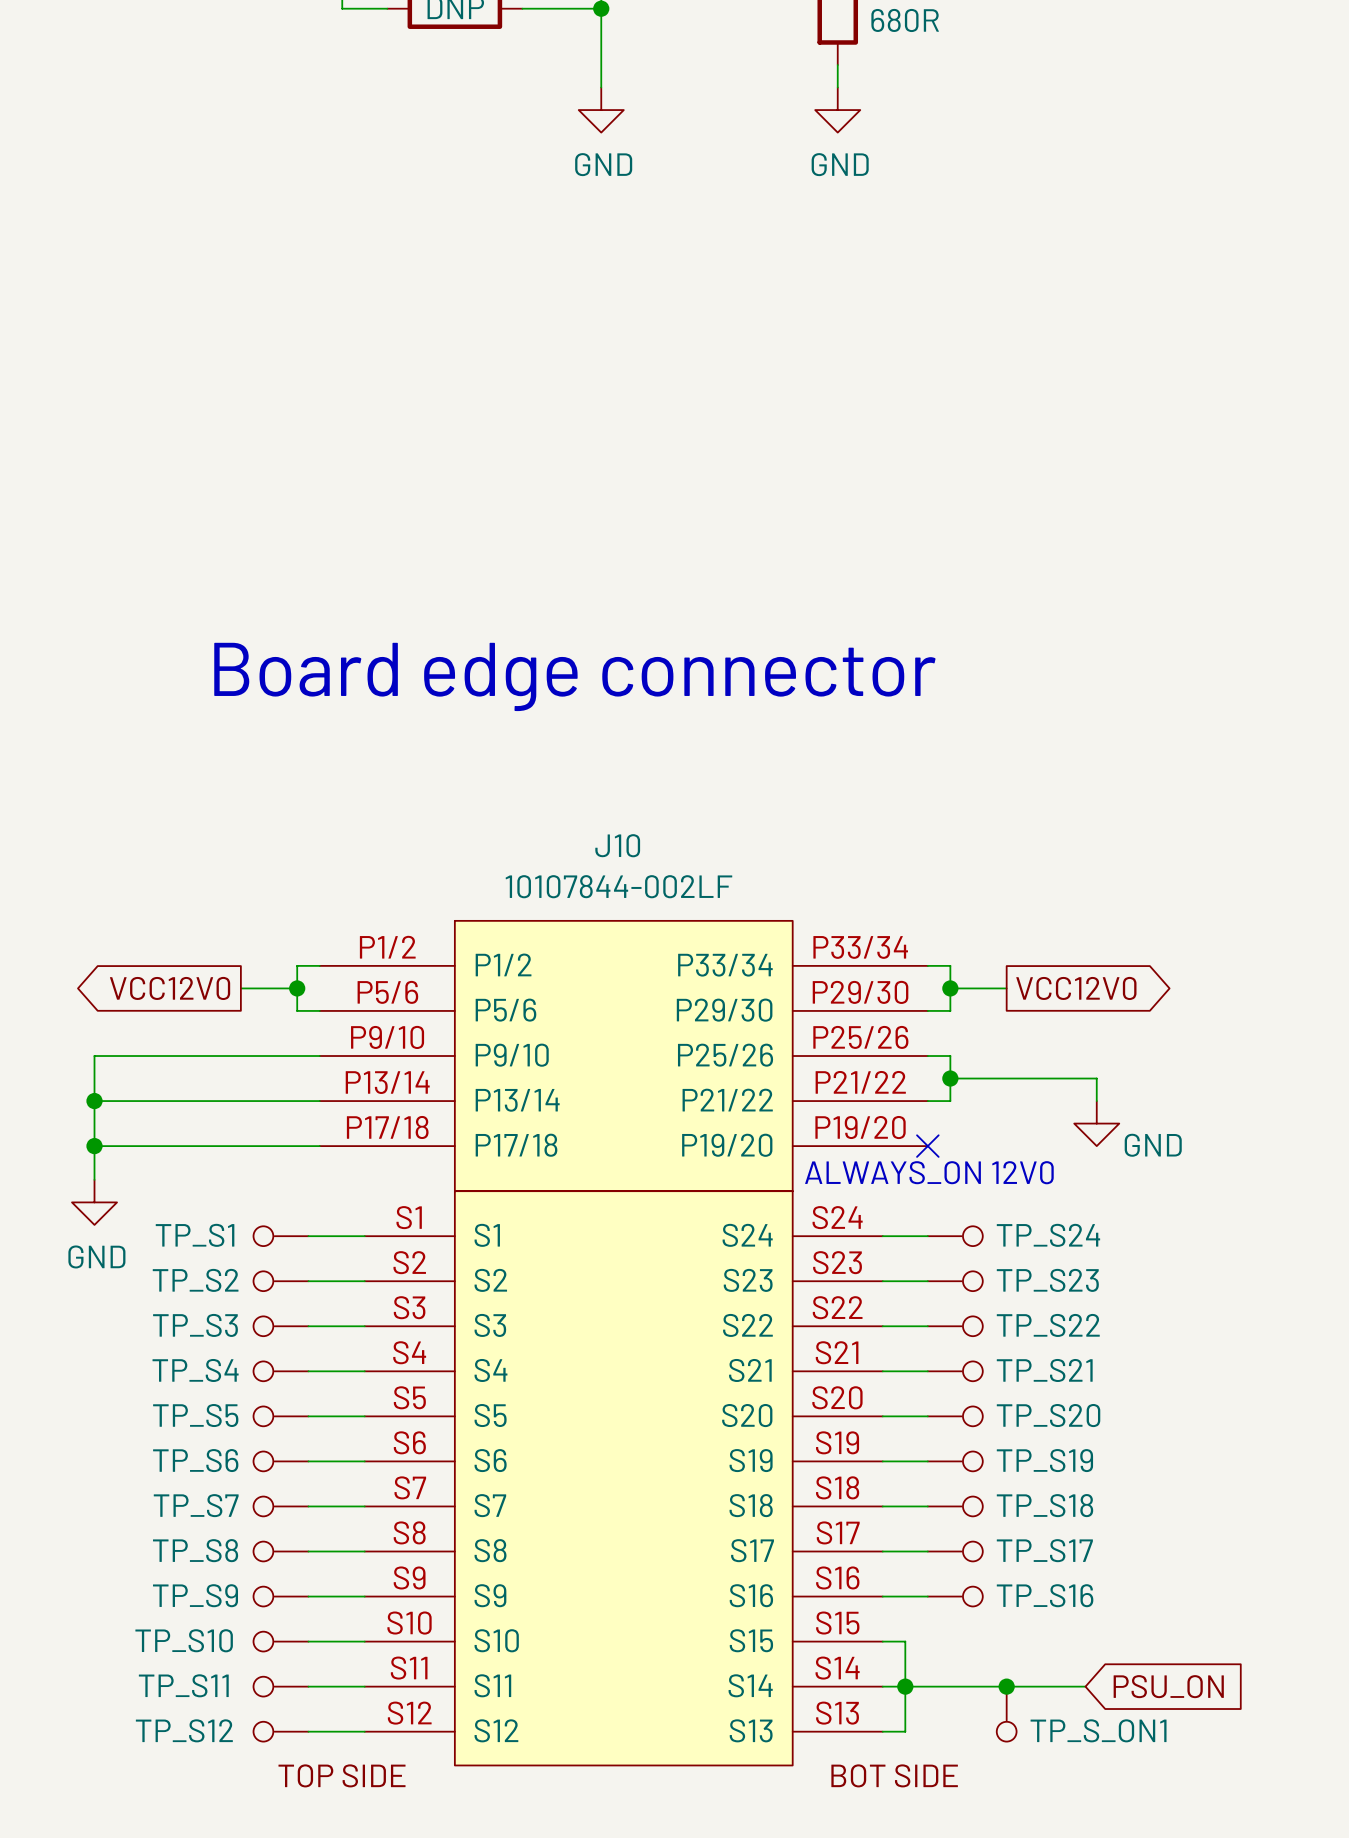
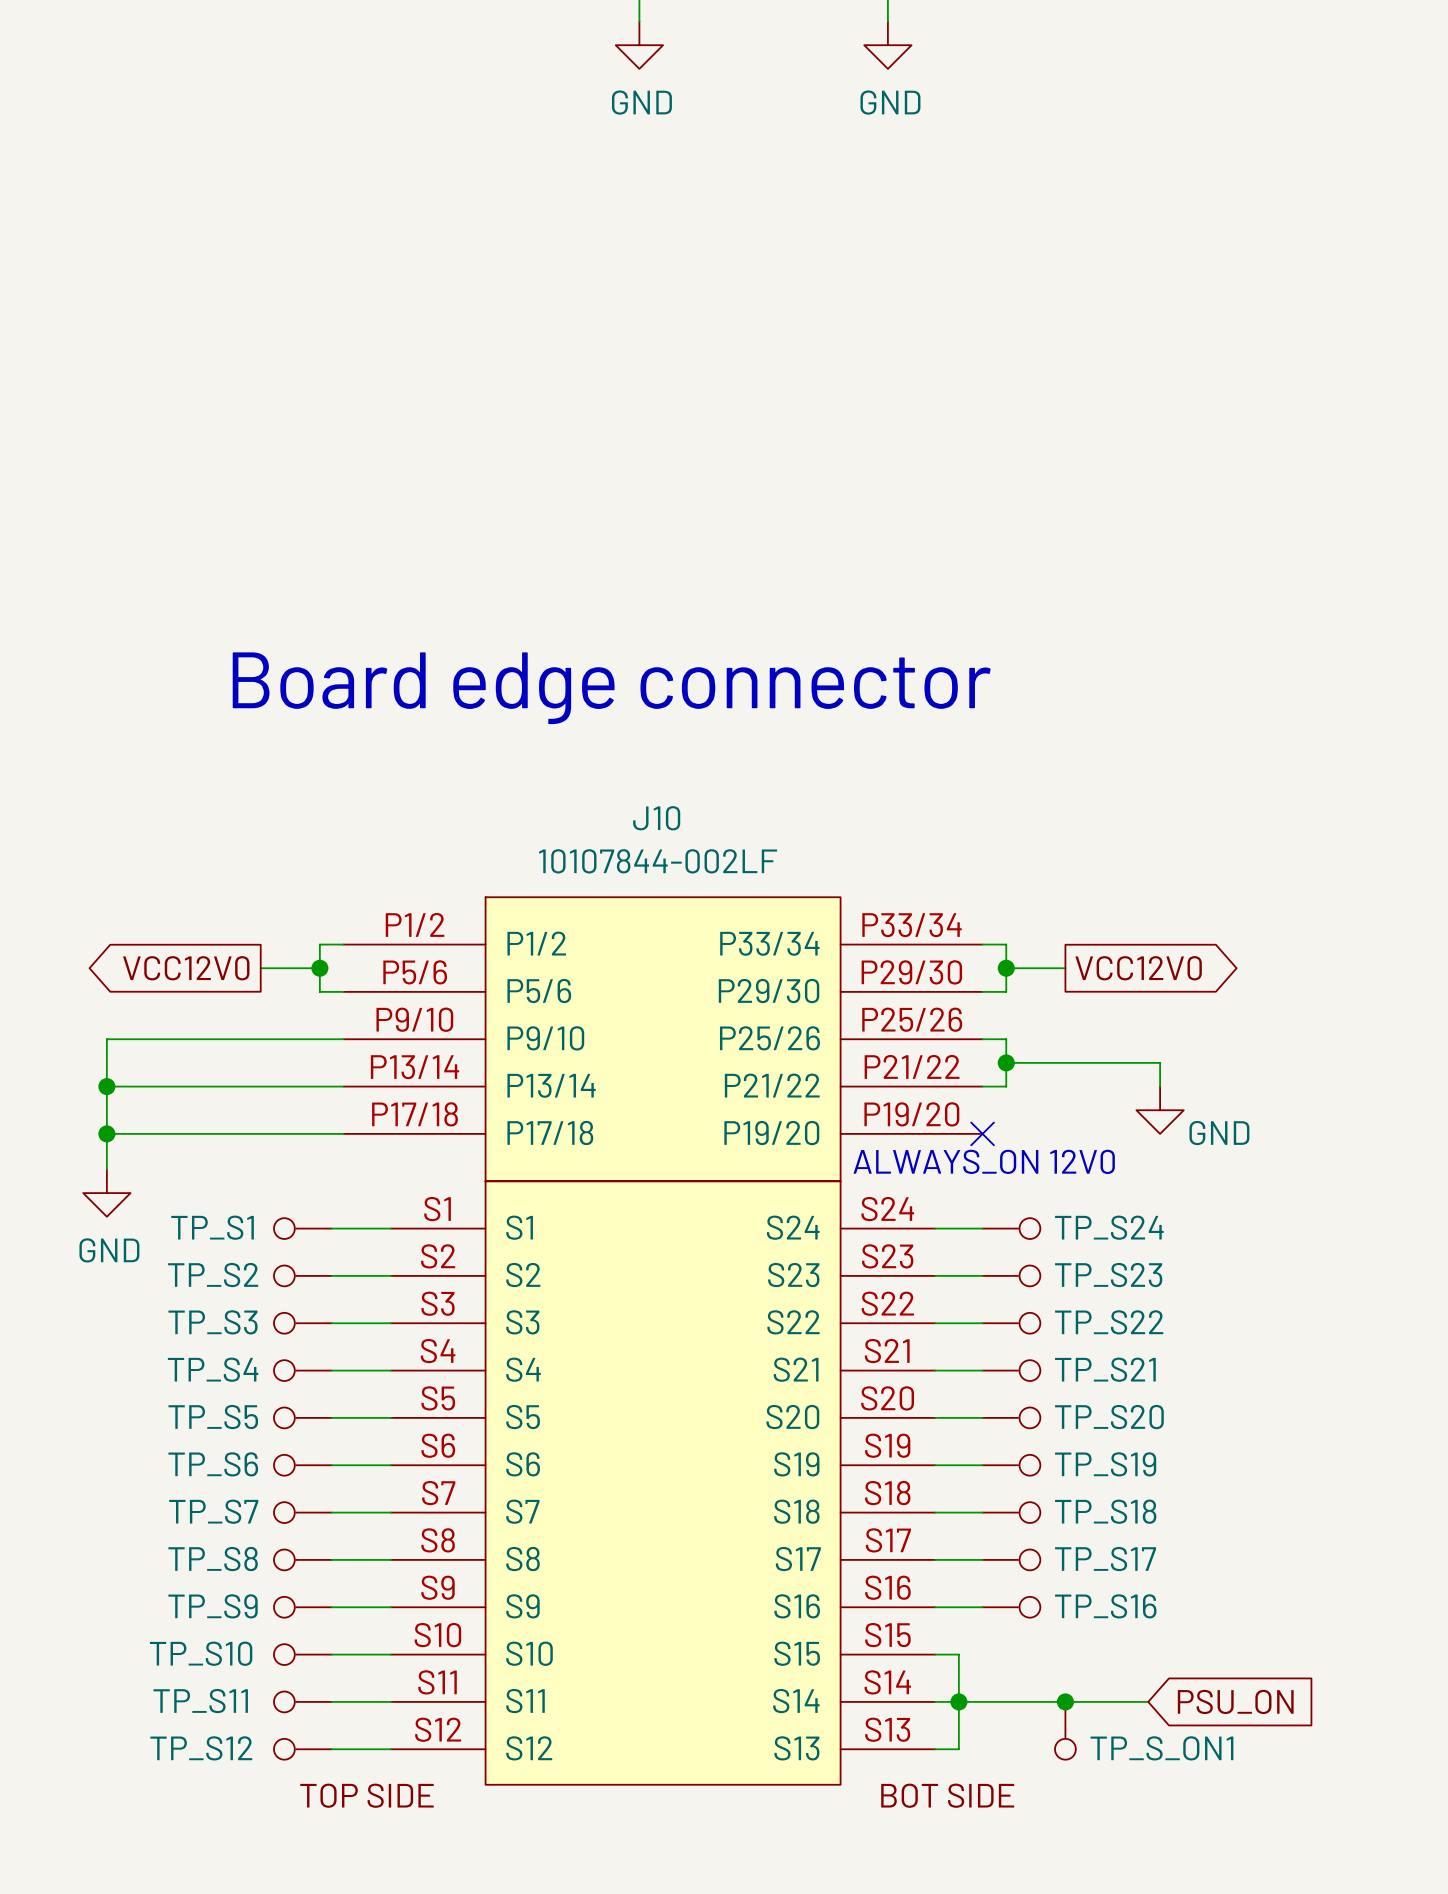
text position: Board edge connector (574, 676) -> Board edge connector (611, 688)

